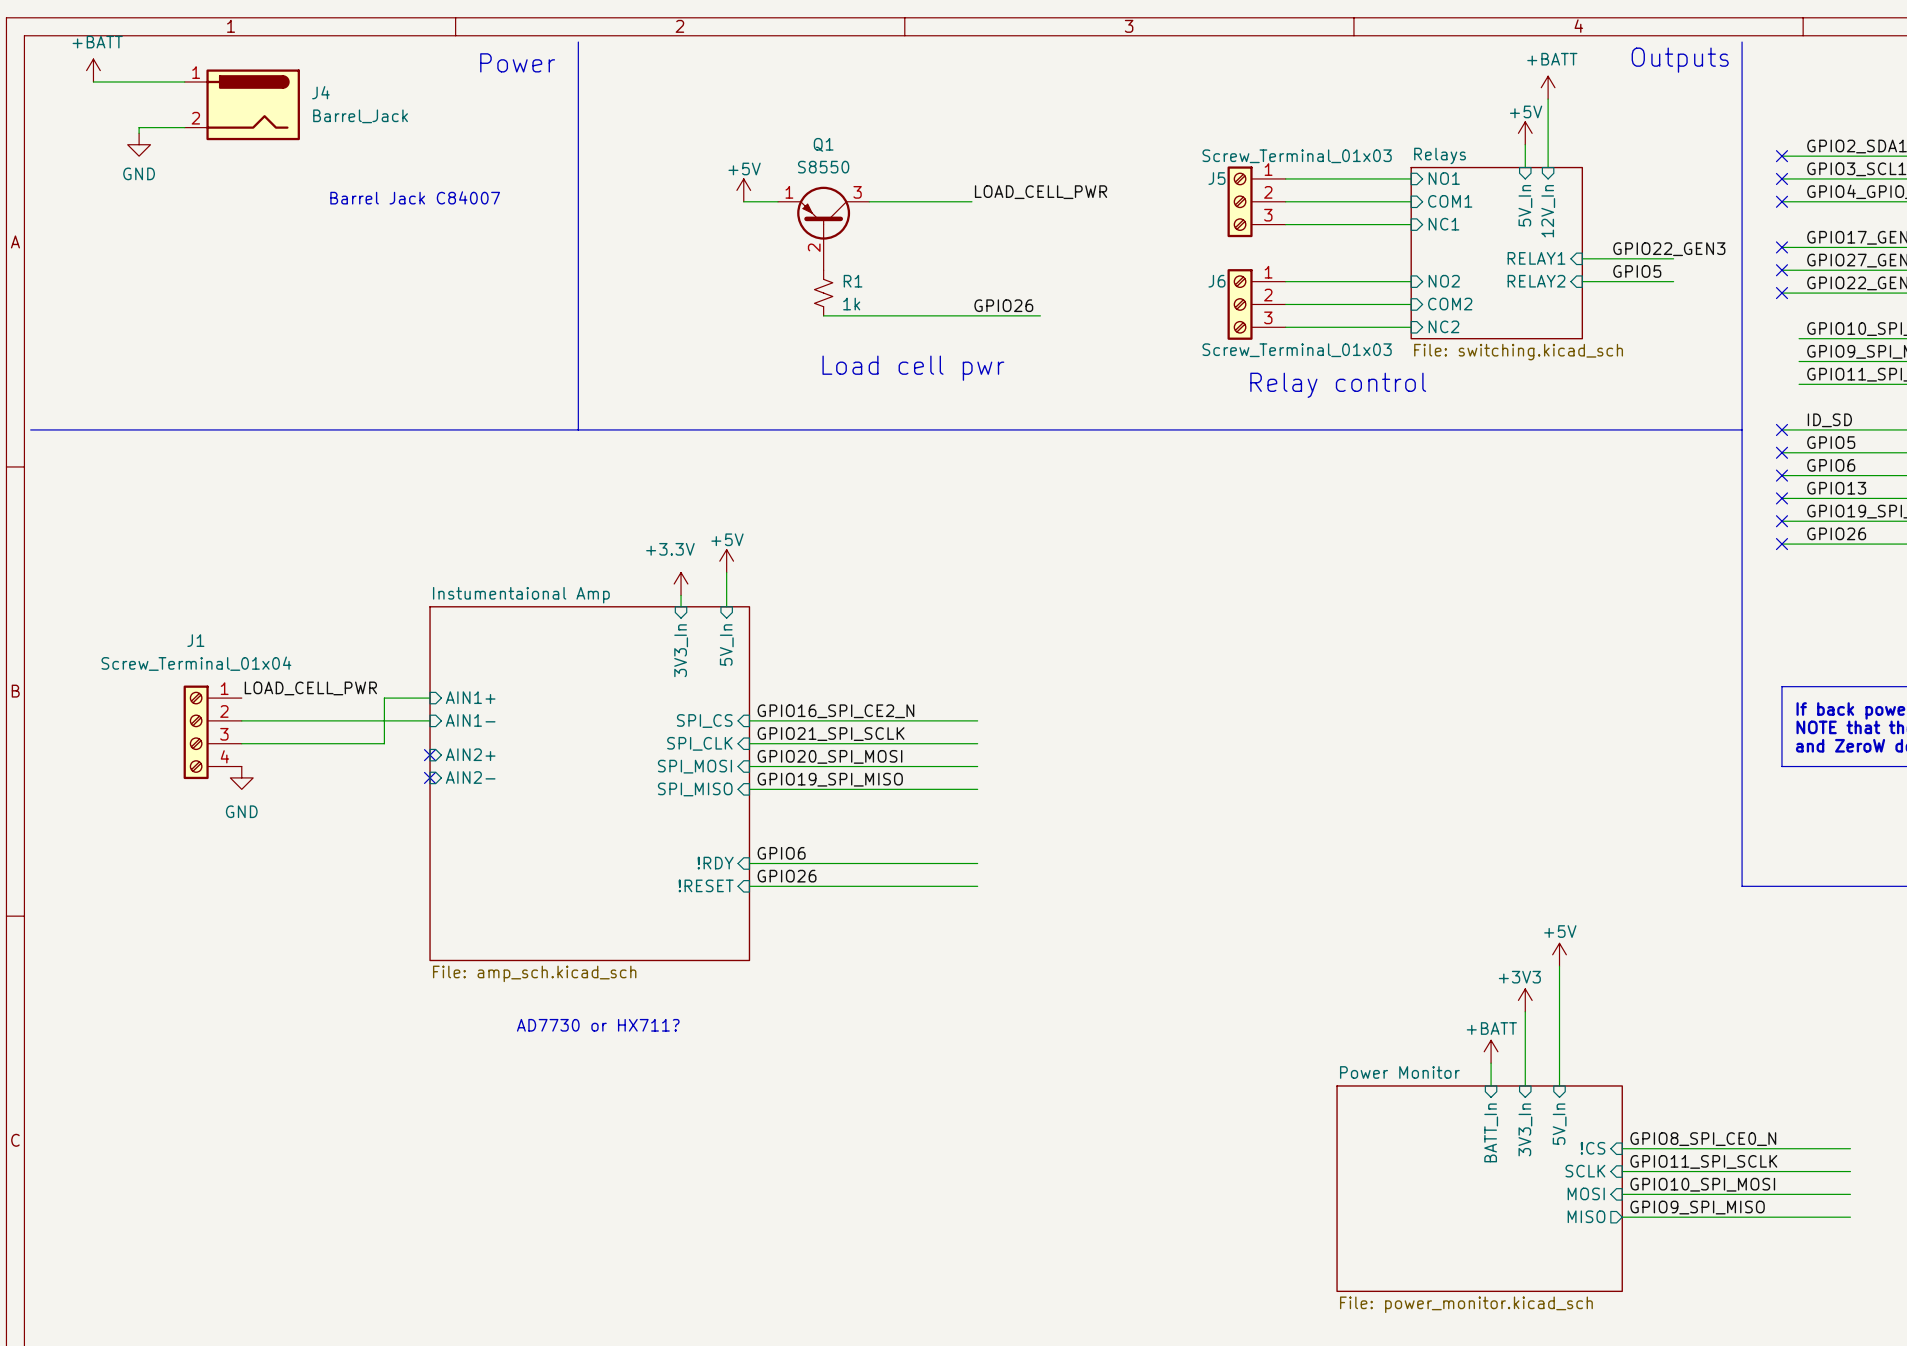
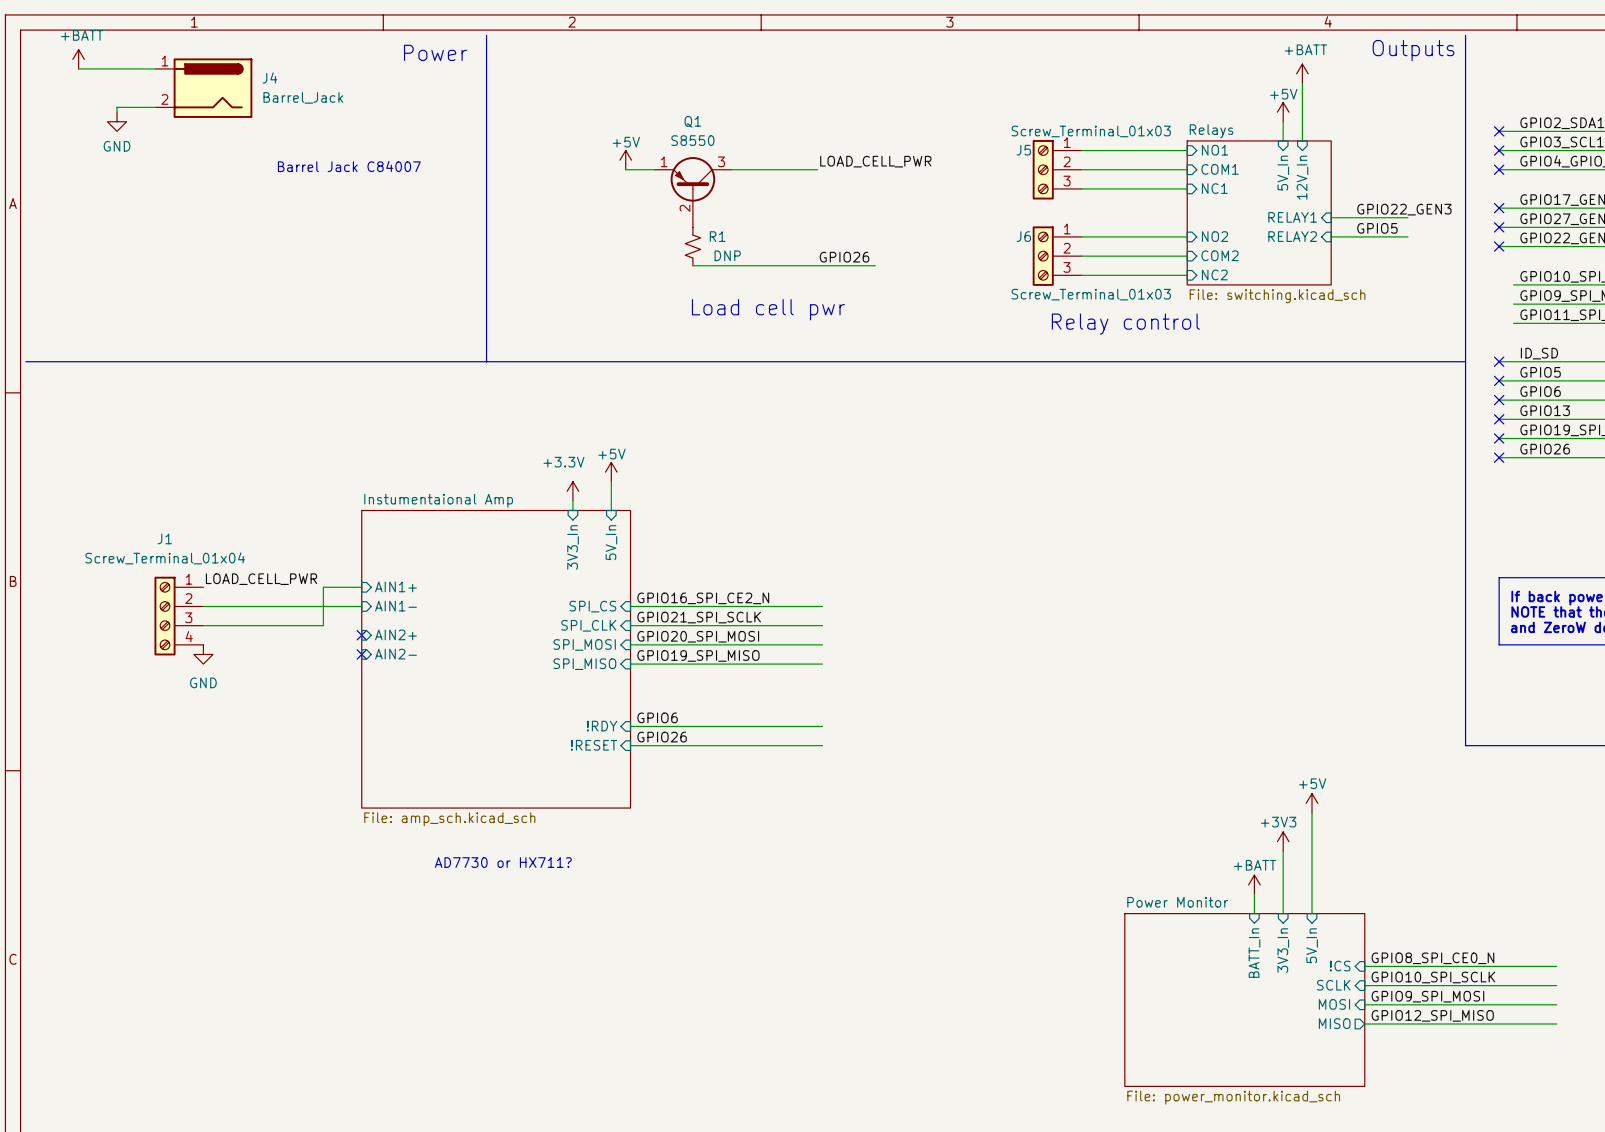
R1 value: 1k (851, 304) -> DNP (727, 255)
label: GPIO11_SPI_SCLK (1703, 1161) -> GPIO10_SPI_SCLK (1433, 977)
label: GPIO10_SPI_MOSI (1702, 1184) -> GPIO9_SPI_MOSI (1427, 996)
label: GPIO9_SPI_MISO (1697, 1207) -> GPIO12_SPI_MISO (1432, 1015)

